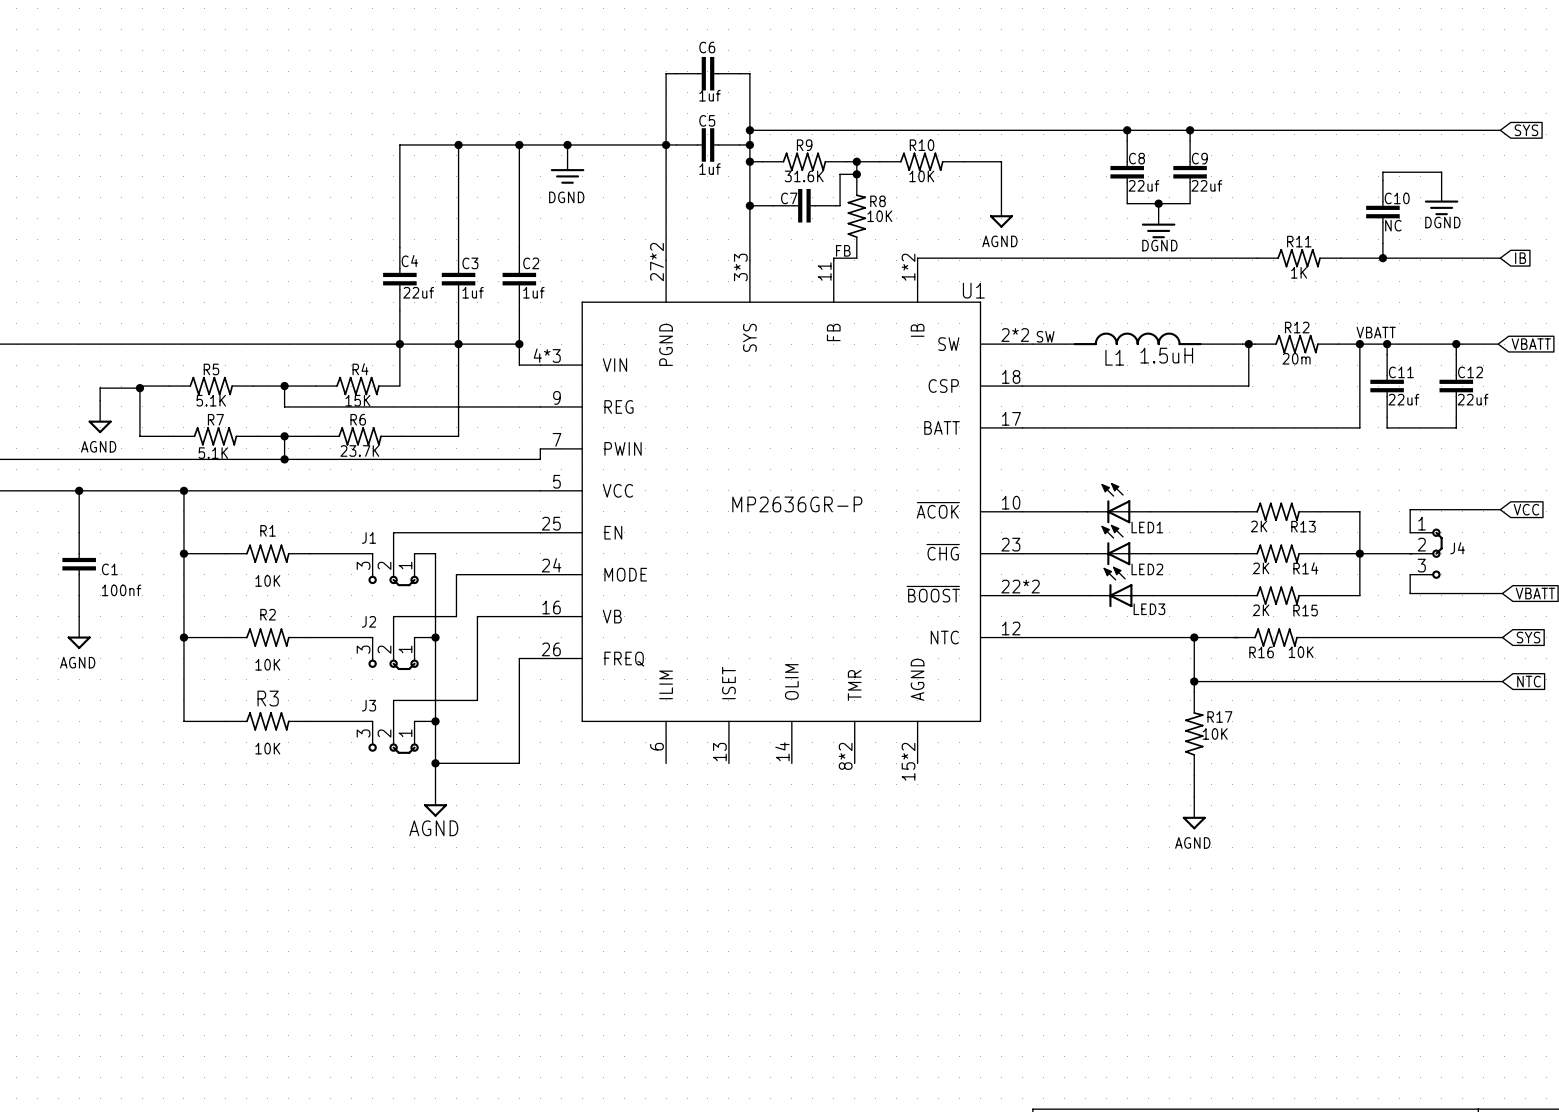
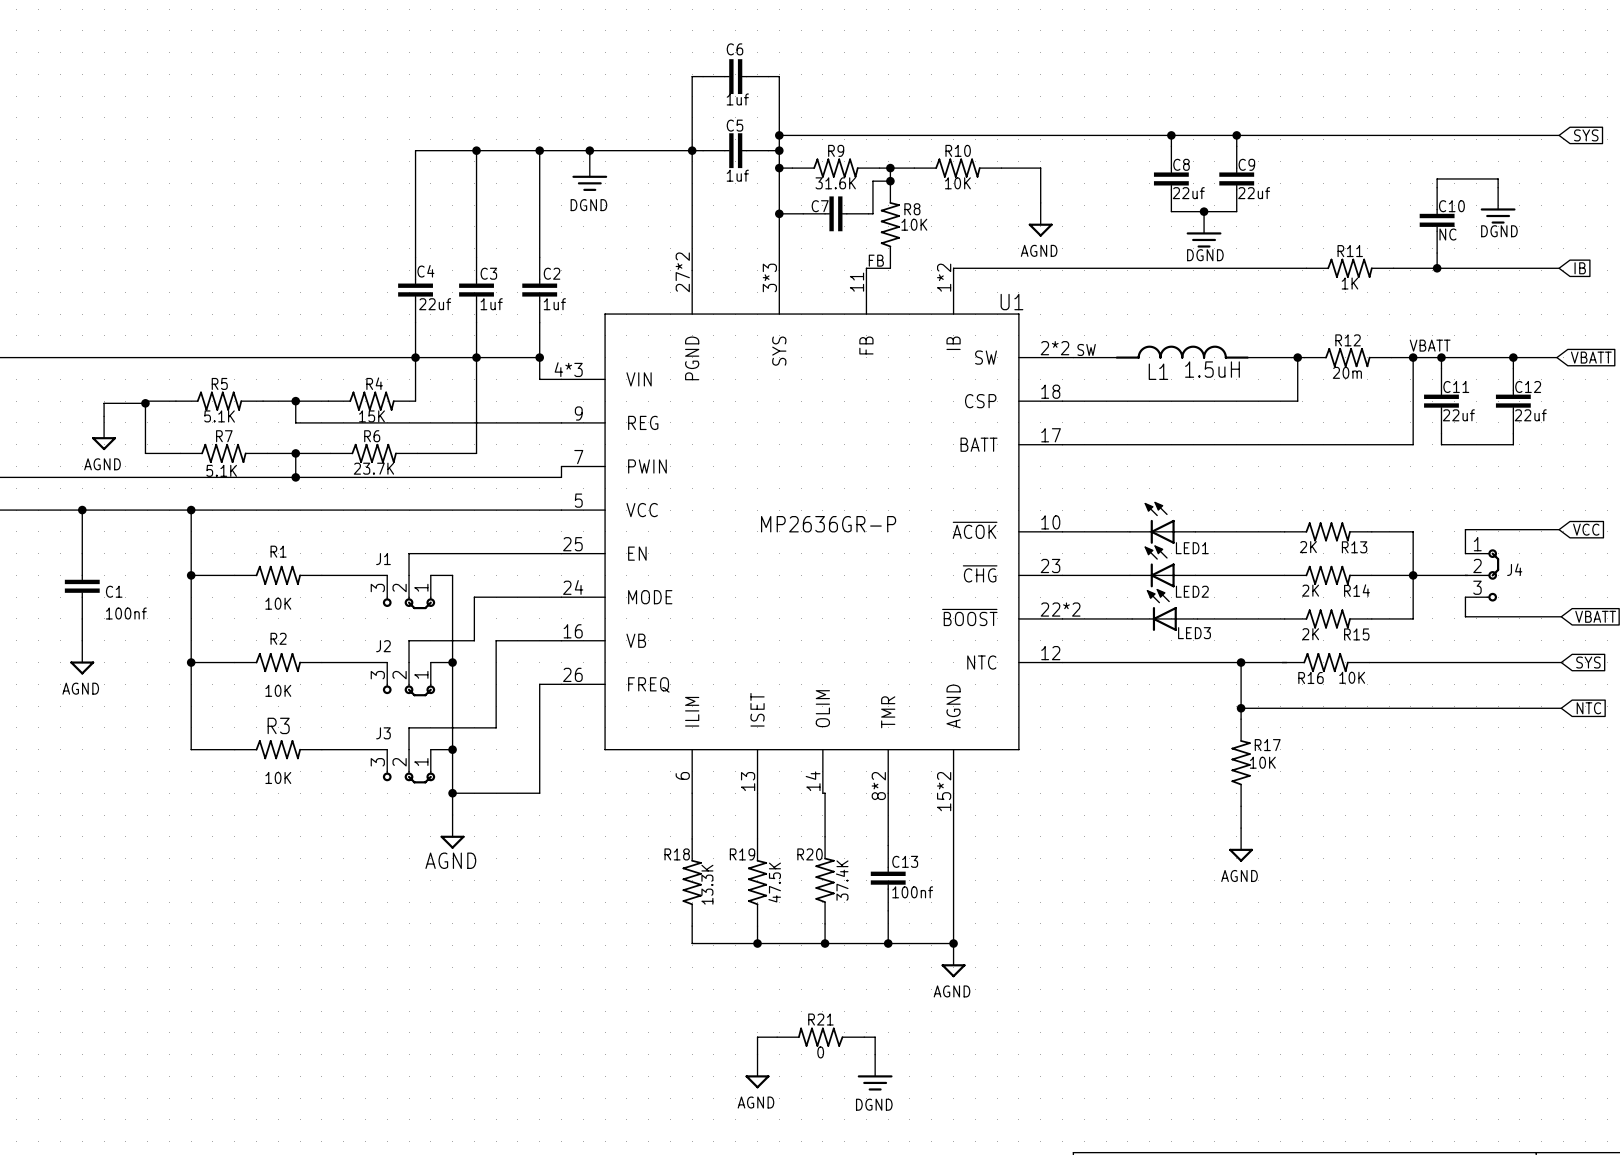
wire: none -> (692, 793) (692, 838)
wire: none -> (757, 793) (757, 838)
wire: none -> (822, 793) (825, 793) (825, 836)
wire: none -> (888, 793) (888, 845)
wire: none -> (953, 793) (953, 943) (692, 943) (692, 926)
C13: none -> 100nf (888, 878)
R20: none -> 37.4K (825, 880)
R18: none -> 13.3K (692, 882)
R19: none -> 47.5K (757, 882)
wire: none -> (888, 910) (888, 943)
wire: none -> (825, 923) (825, 943)
wire: none -> (757, 926) (757, 943)
junction: none -> (757, 943)
junction: none -> (825, 943)
junction: none -> (888, 943)
junction: none -> (953, 943)
power symbol: none -> AGND (953, 960)
wire: none -> (777, 1037) (757, 1037) (757, 1054)
R21: none -> 0 (820, 1037)
wire: none -> (864, 1037) (875, 1037) (875, 1054)
power symbol: none -> AGND (757, 1071)
power symbol: none -> DGND (875, 1072)

